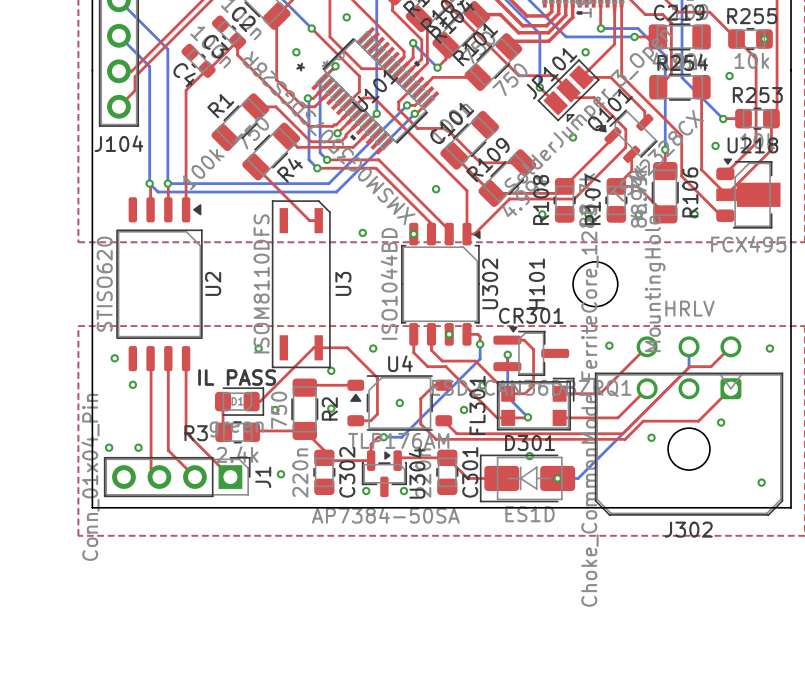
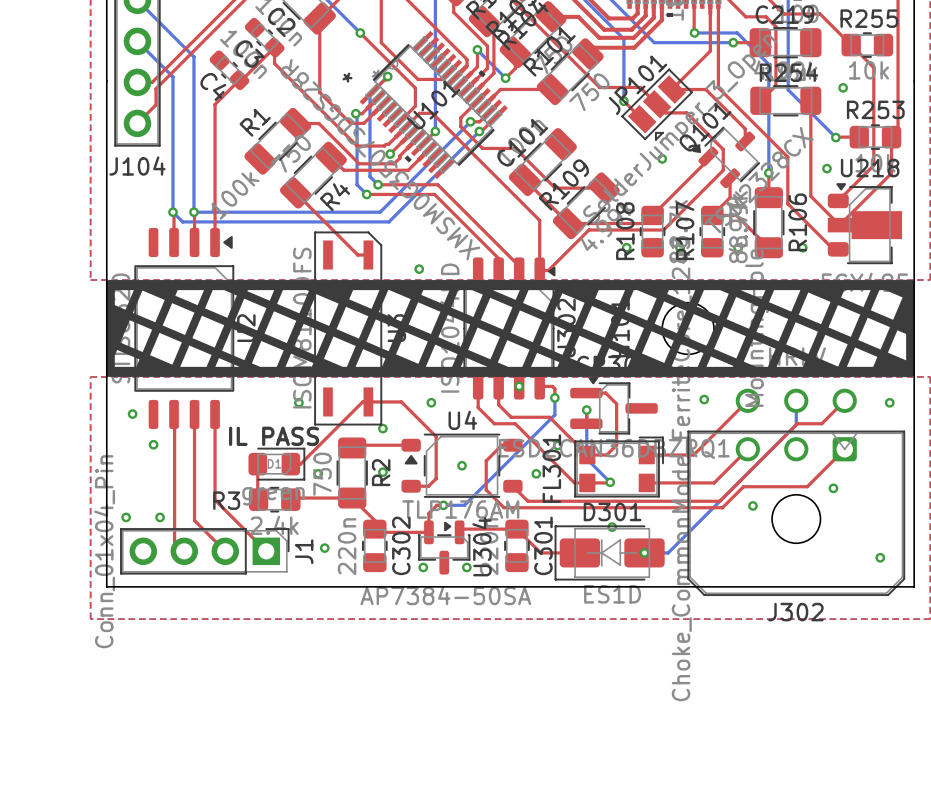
via: (346, 17) -> none
via: (764, 39) -> none
via: (296, 52) -> none
via: (585, 52) -> none
via: (436, 189) -> none
via: (413, 234) -> none
drawing: none -> [106, 280, 915, 377]

